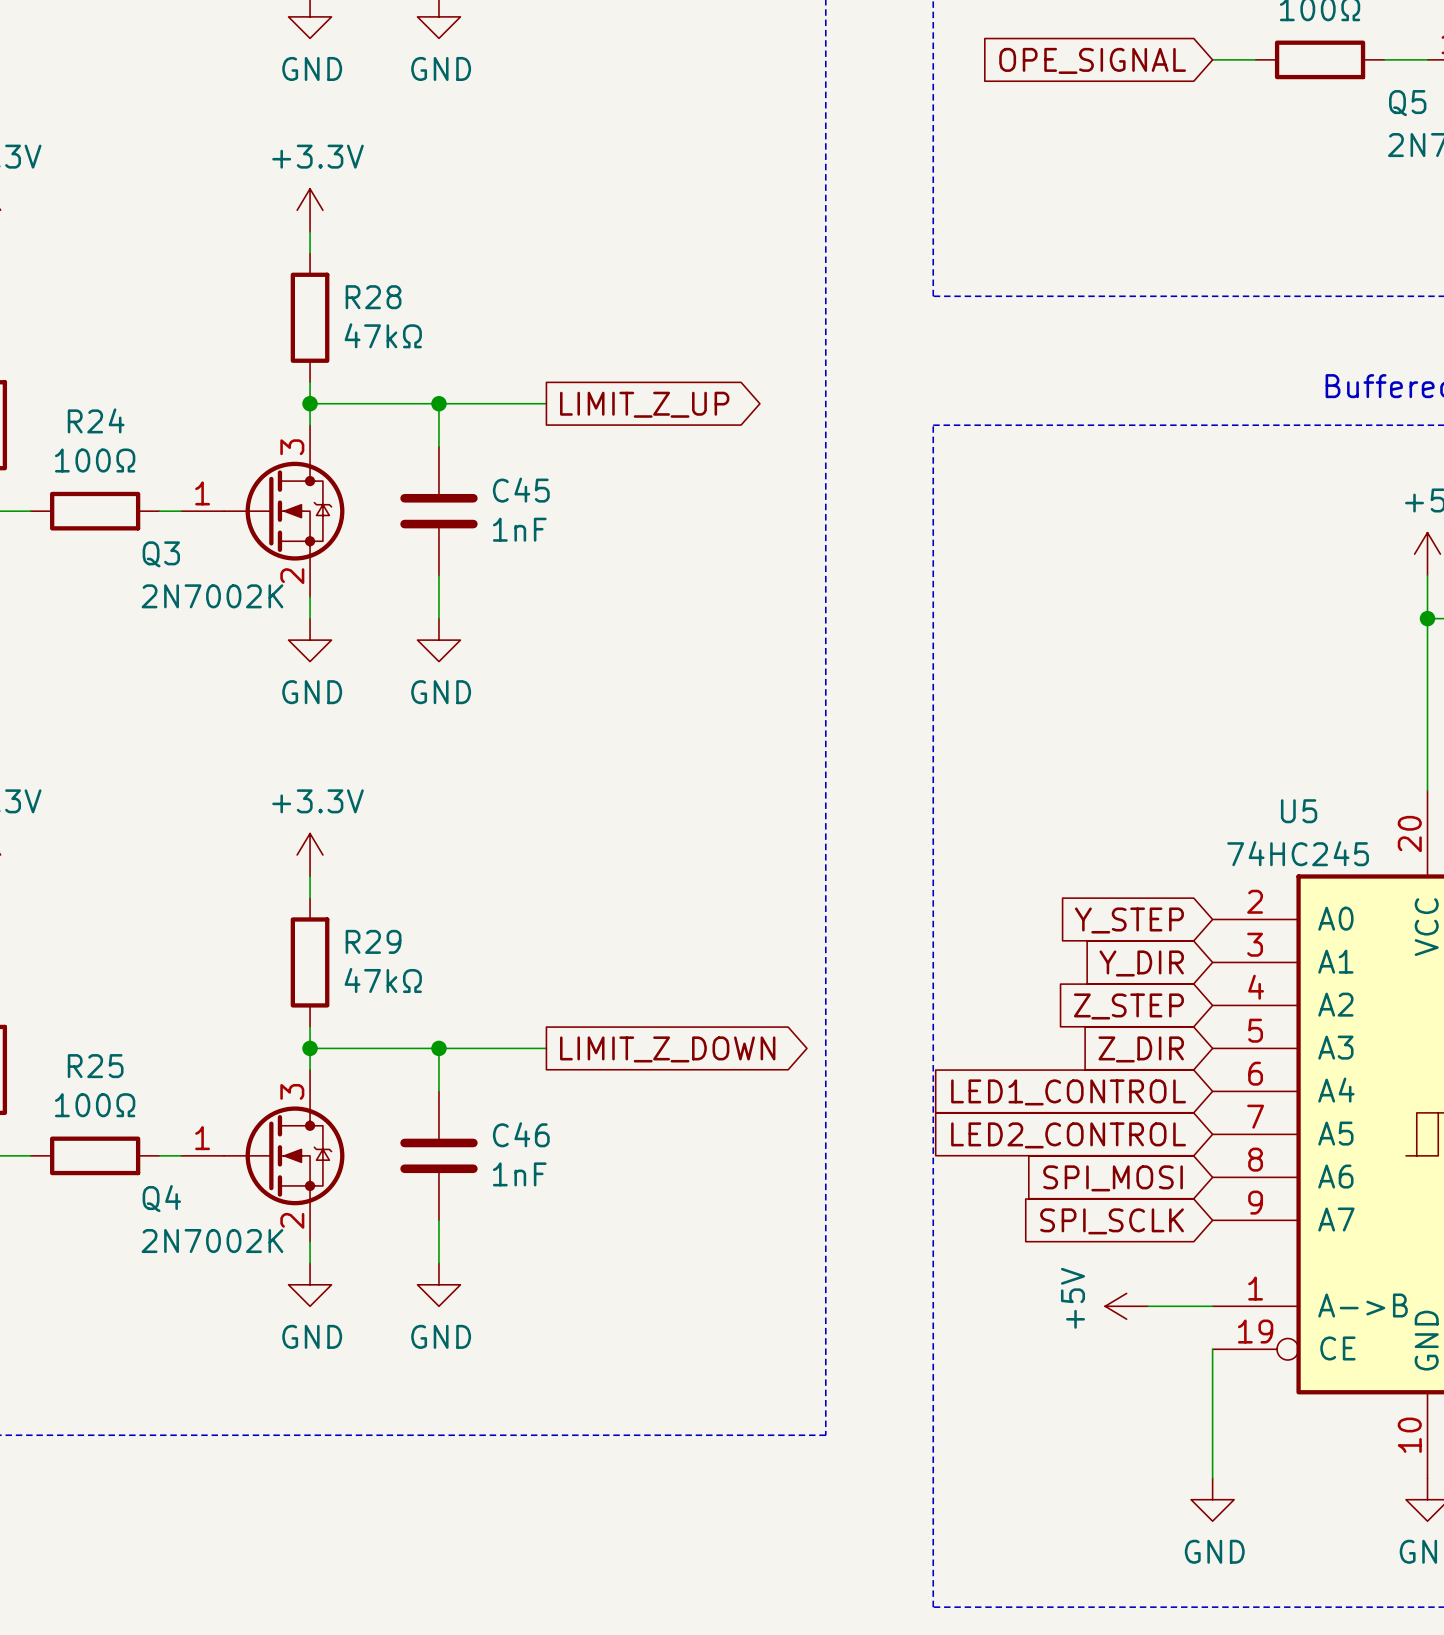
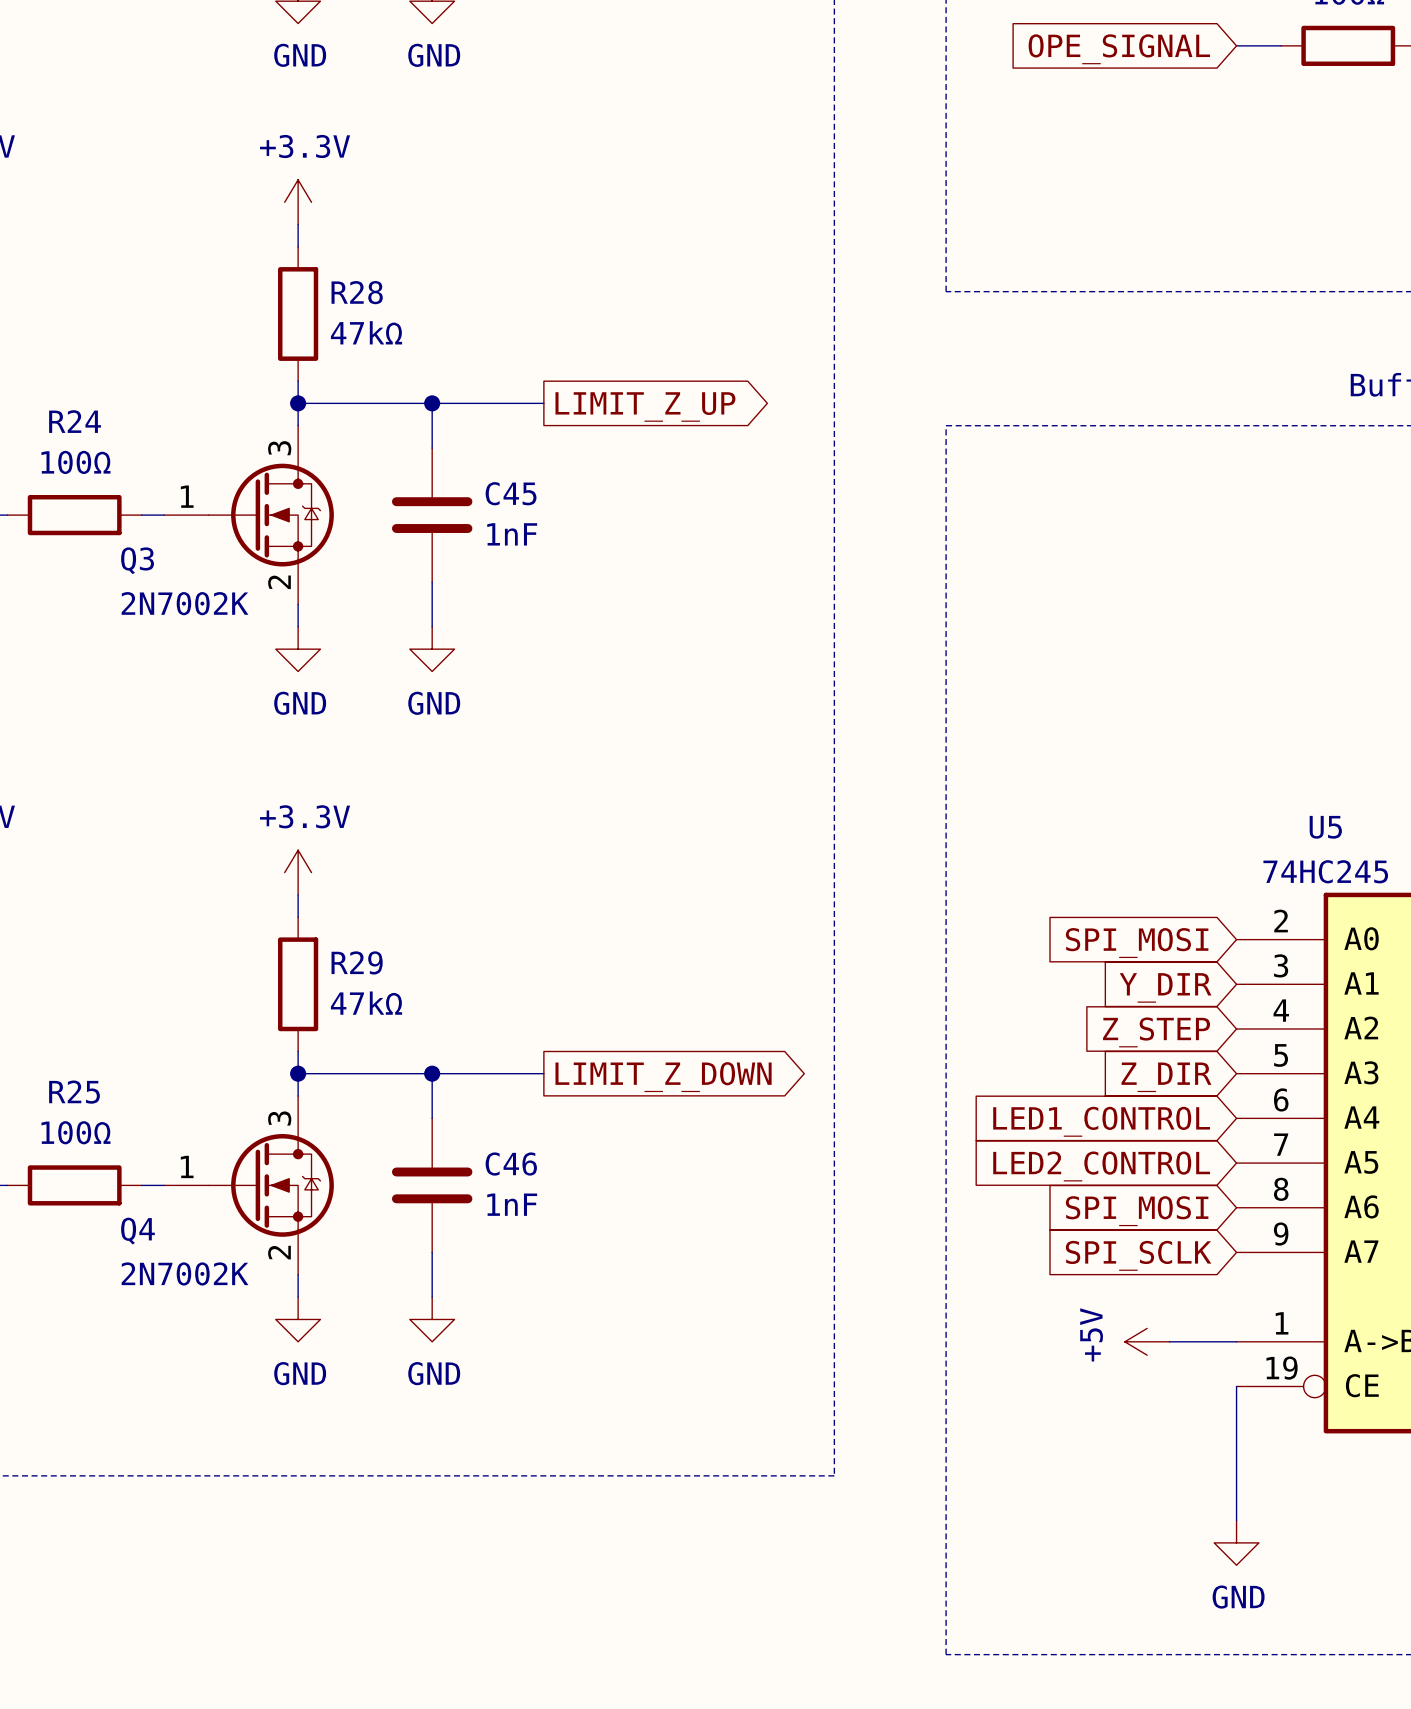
global label: Y_STEP (1129, 920) -> SPI_MOSI (1137, 943)

